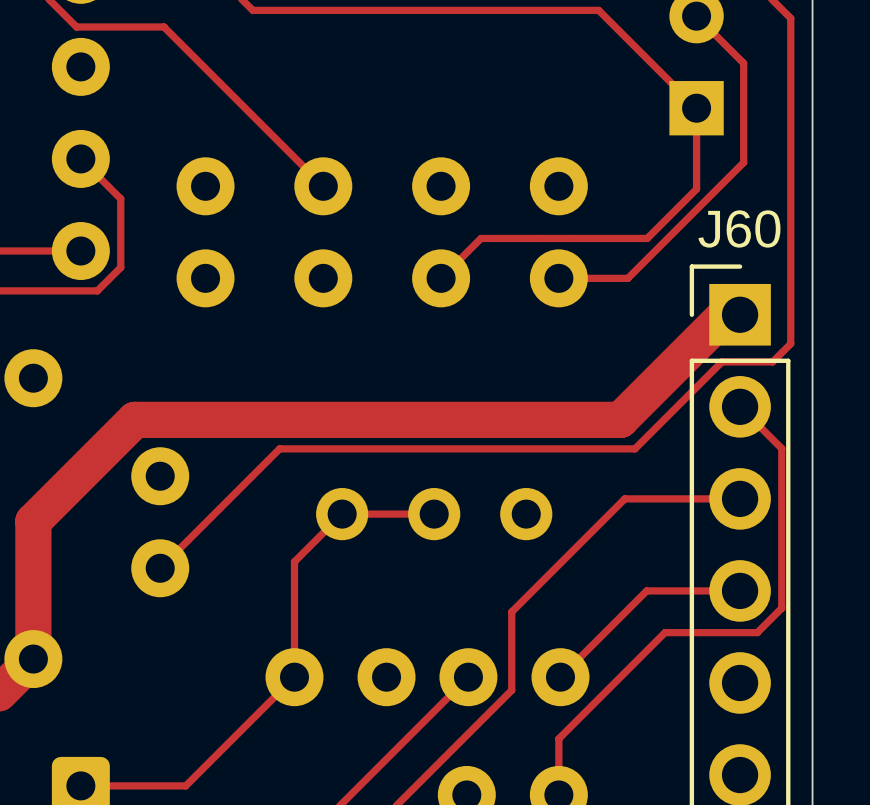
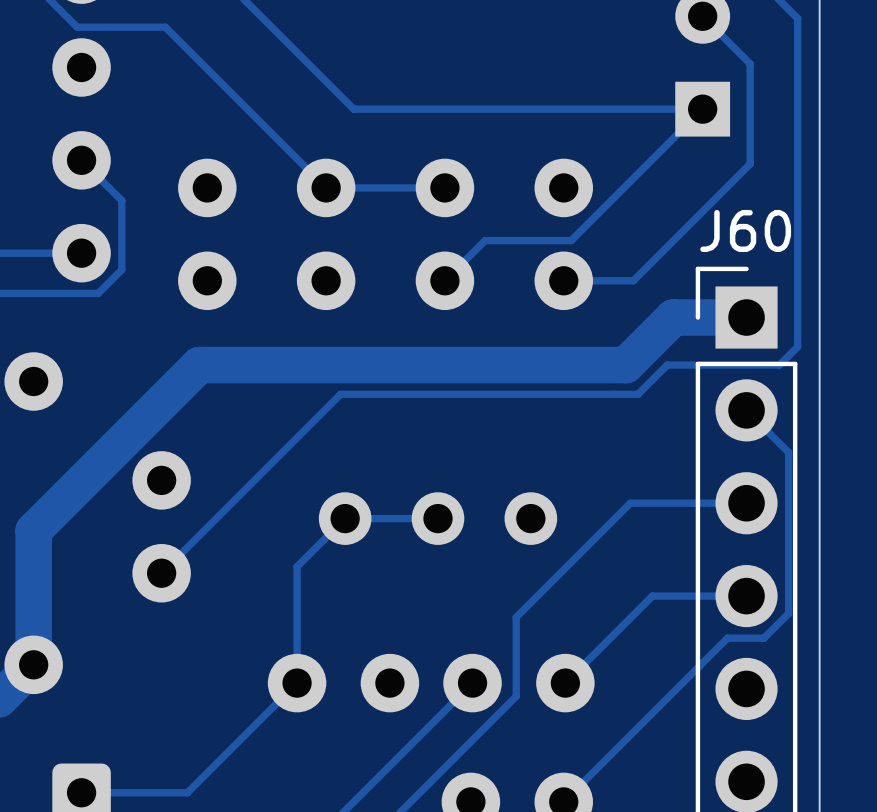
track: (252, 10) (598, 10) (696, 108) (696, 189) (647, 238) (566, 238) -> (255, 10) (353, 109) (702, 109) (571, 240)
track: none -> (326, 187) (444, 187)
track: (725, 314) (620, 419) (134, 419) (33, 521) (33, 526) -> (731, 317) (673, 317) (625, 365) (199, 365) (33, 530)
track: (721, 361) (634, 448) (279, 448) -> (728, 365) (667, 365) (637, 394) (340, 394) (282, 452)
track: (721, 632) (665, 632) (558, 738) (558, 794) -> (727, 638) (563, 801)

